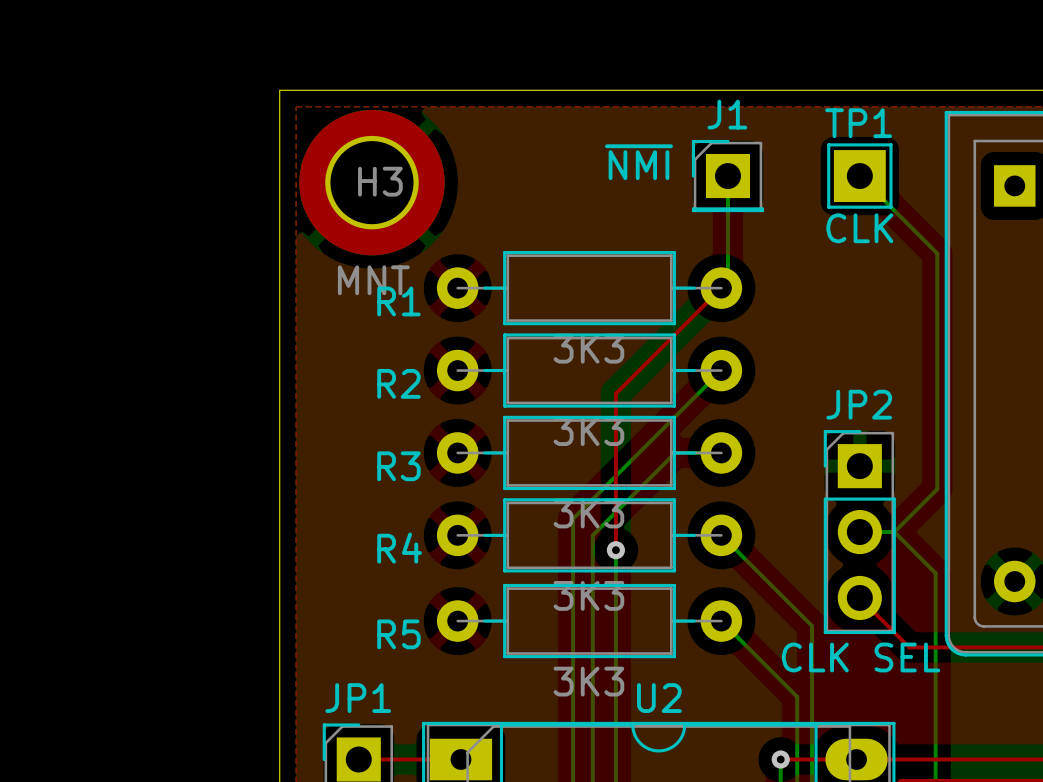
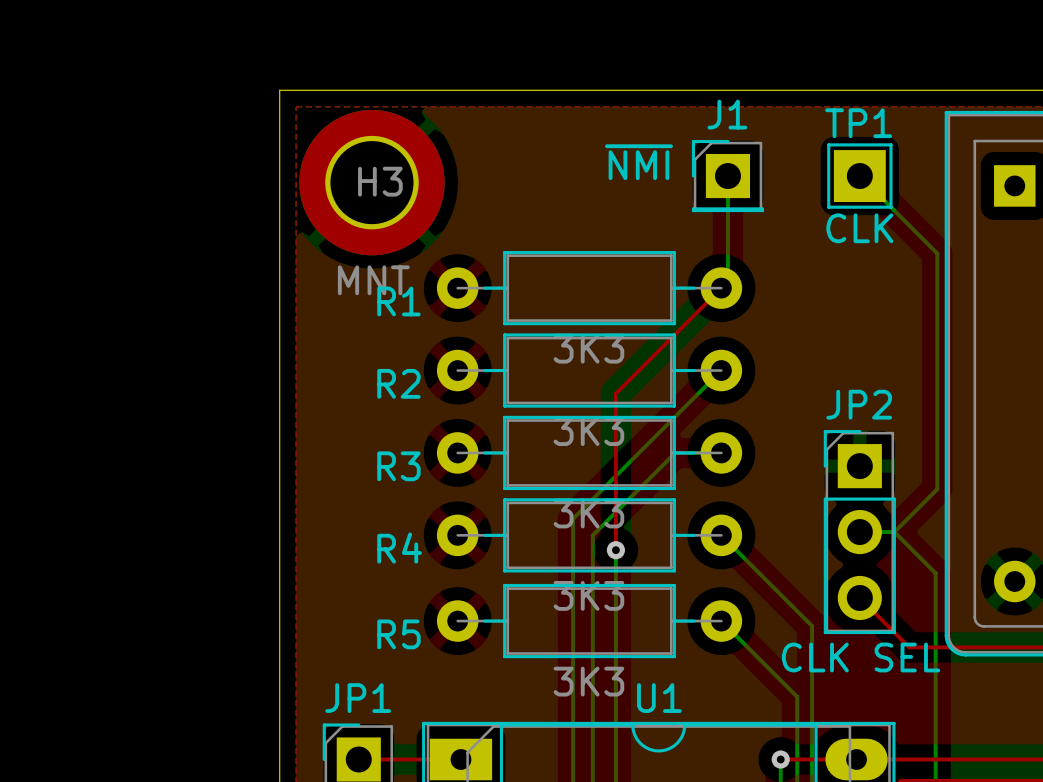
U2 name: U2 (659, 698) -> U1 (659, 698)

